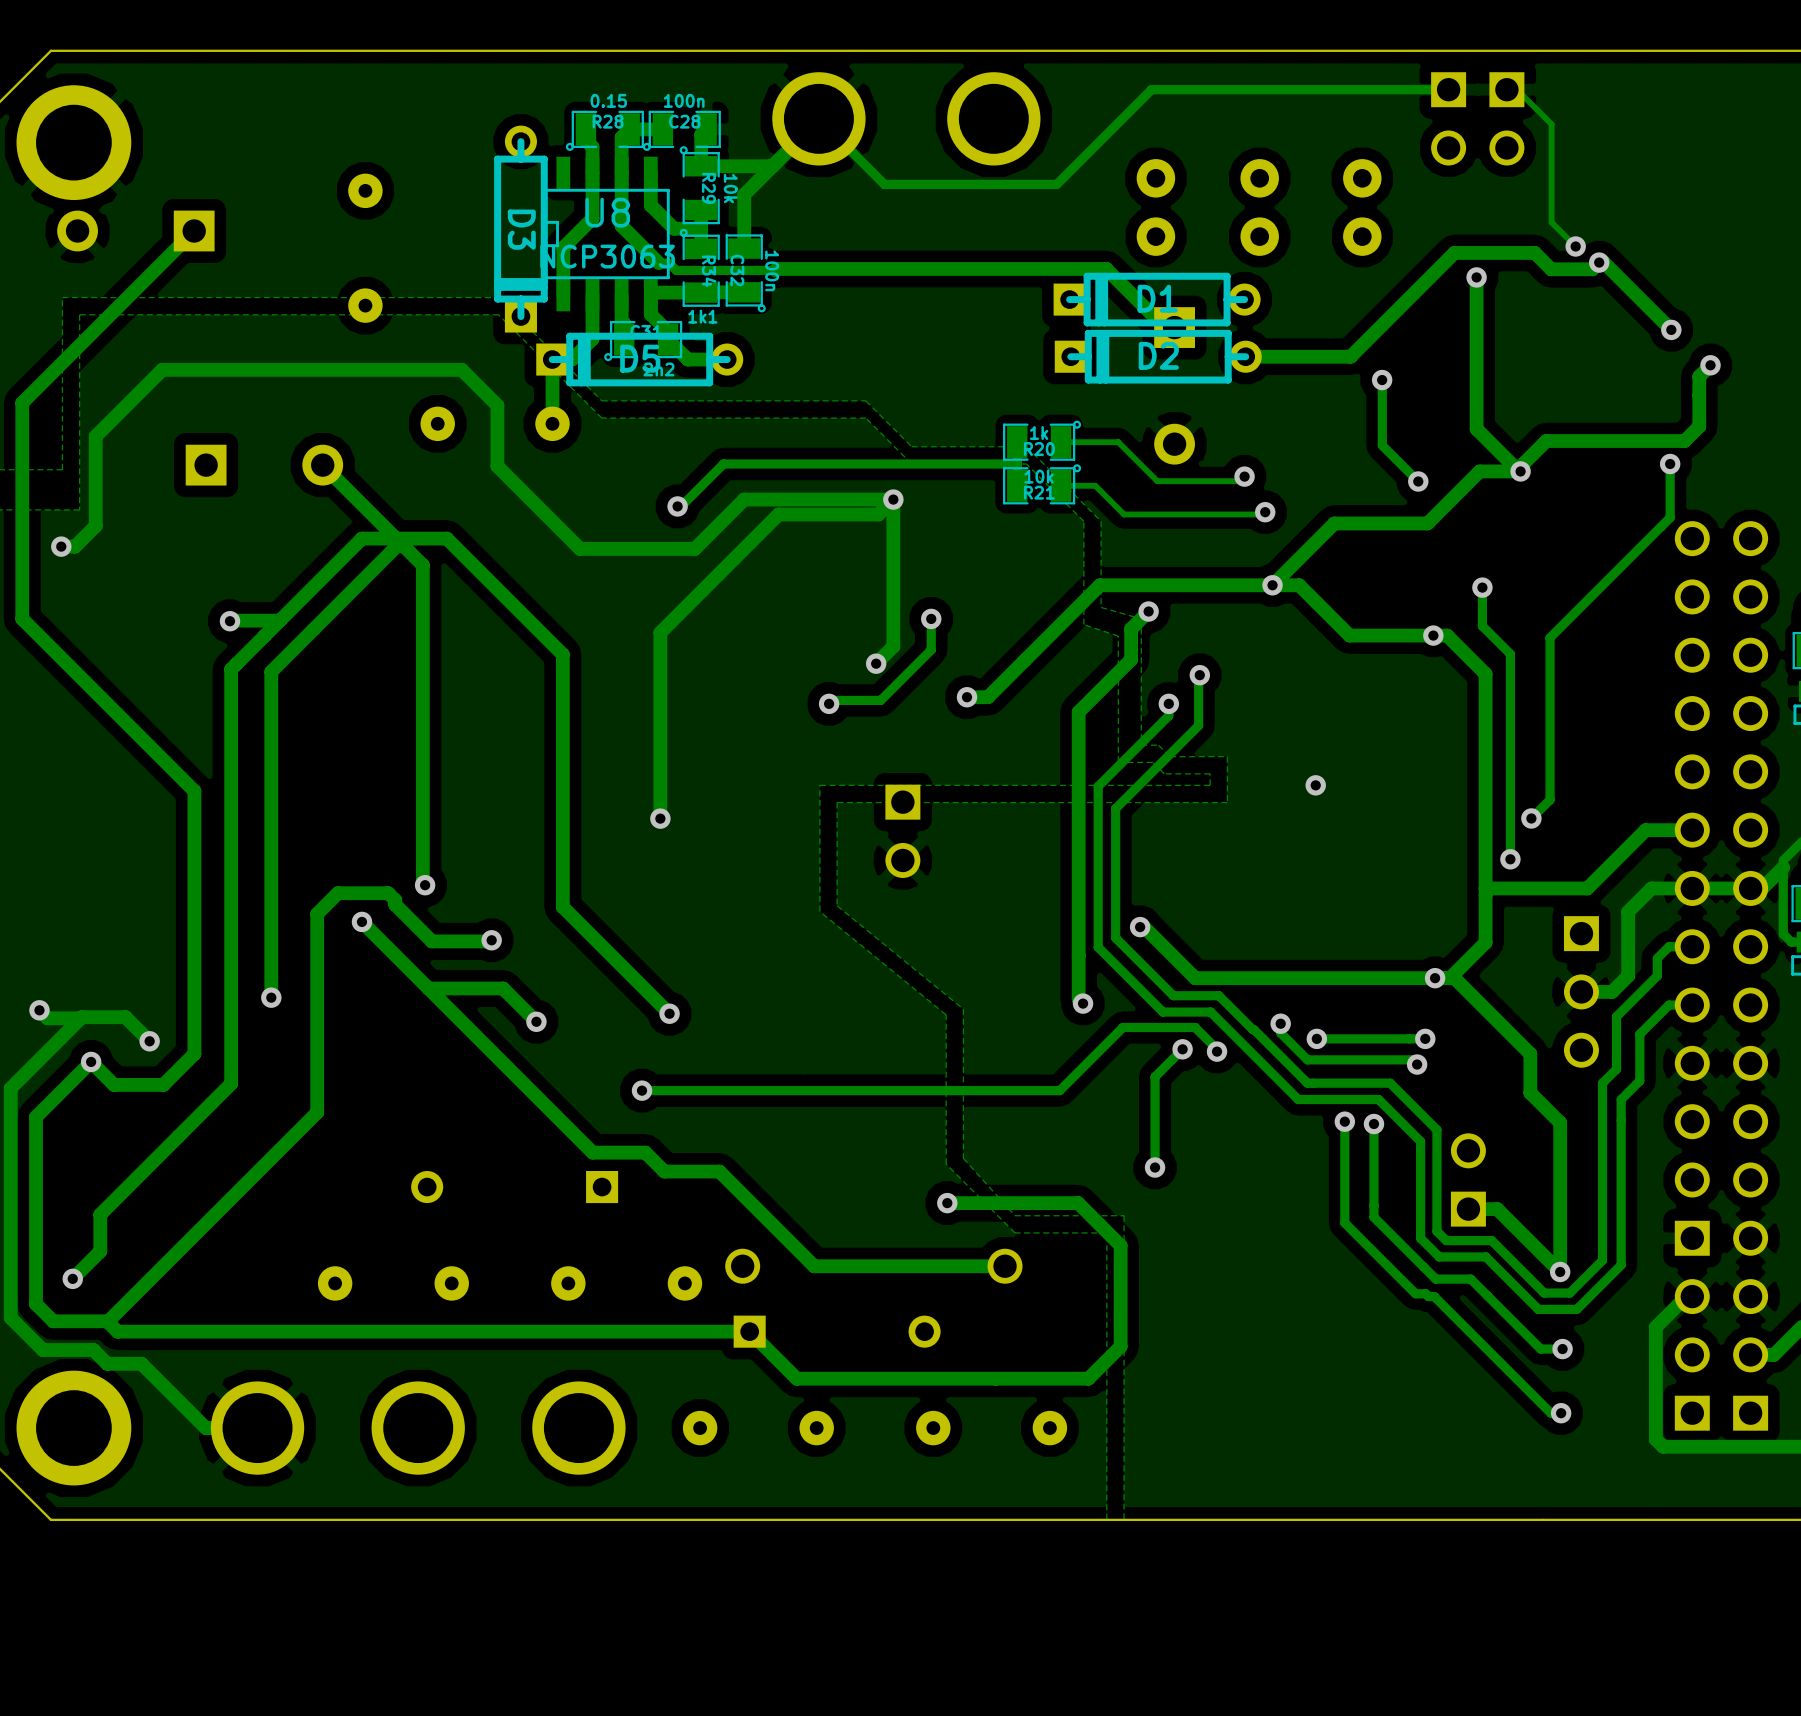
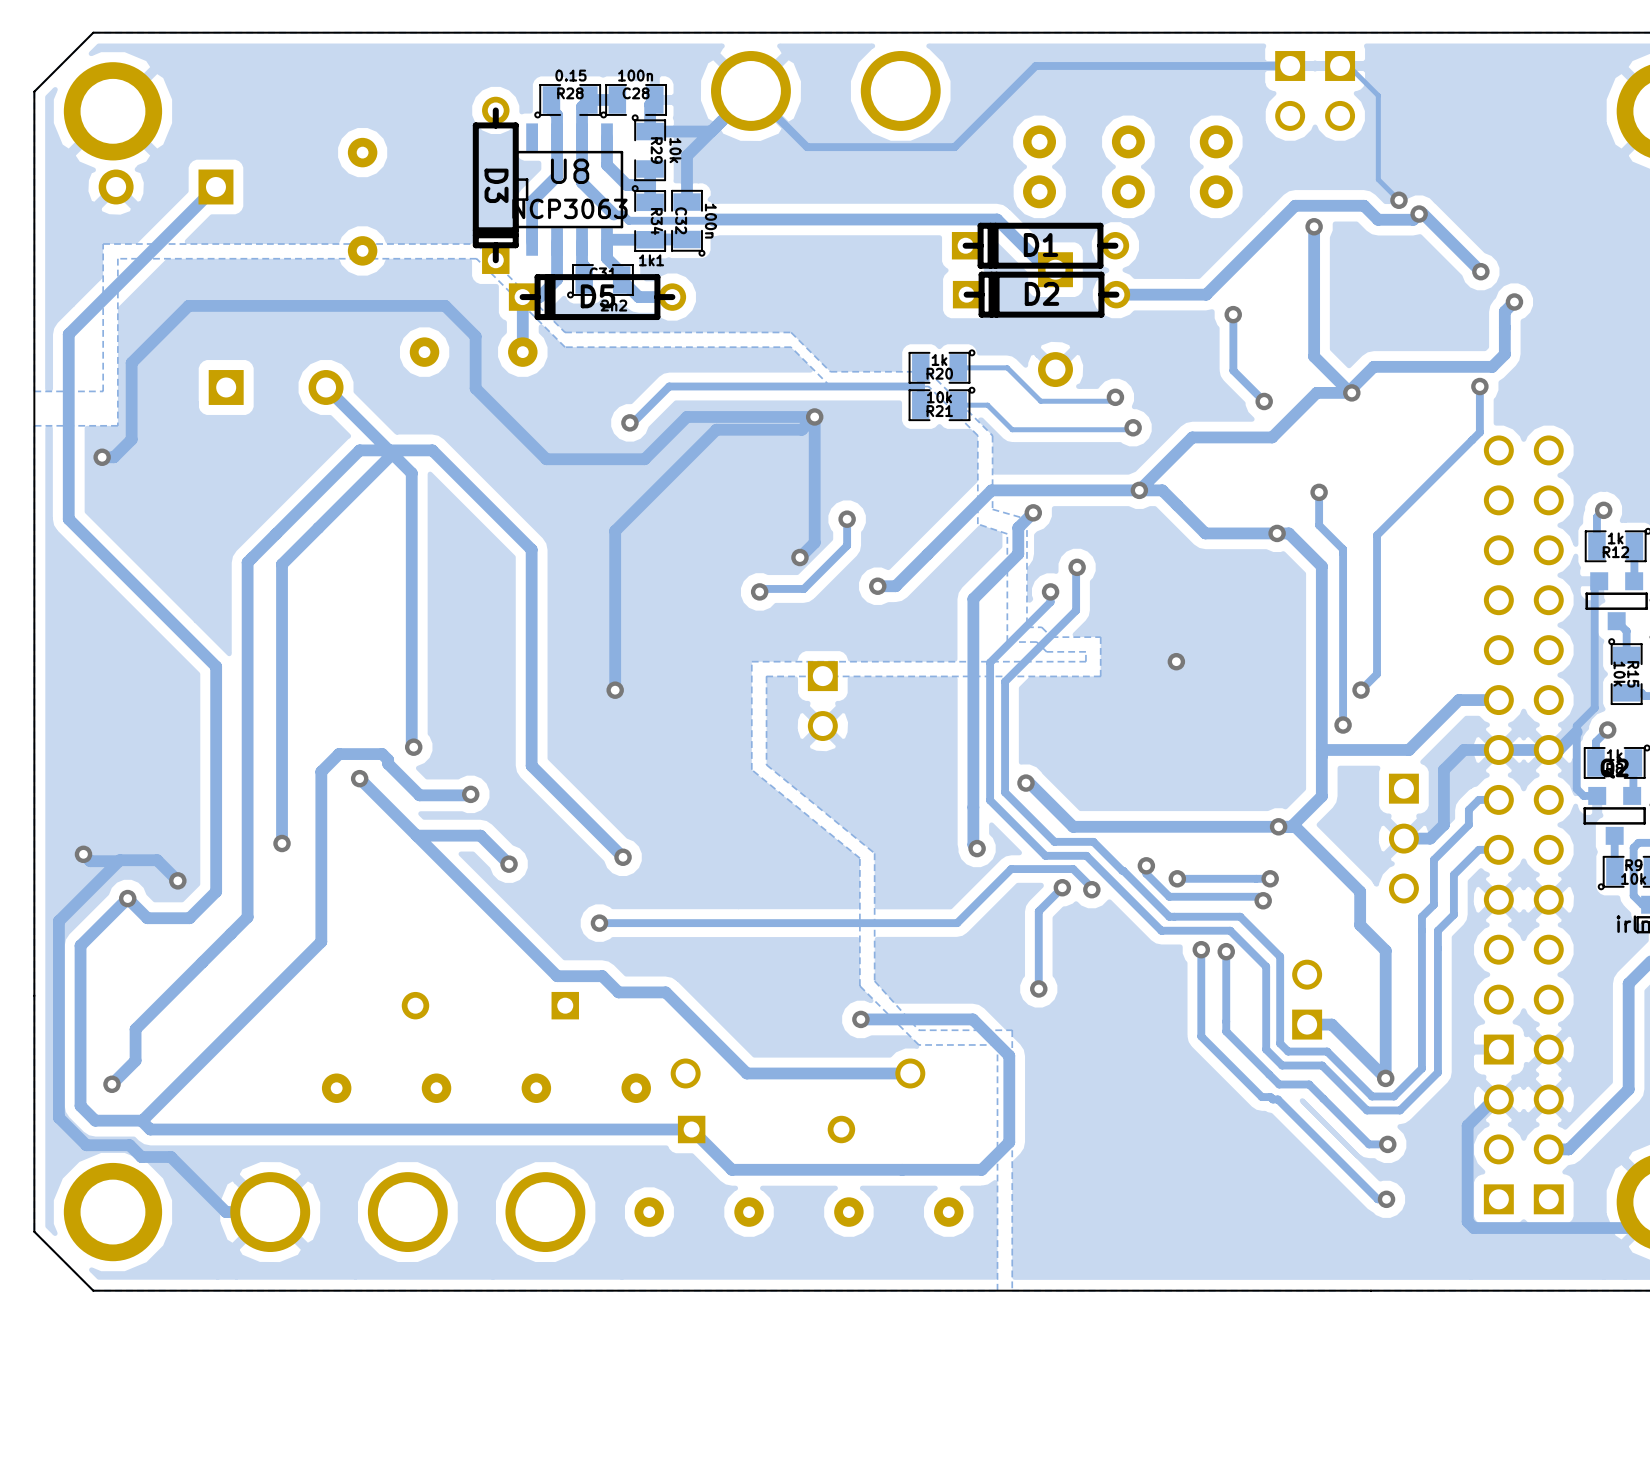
track: (279, 620) (229, 621) -> none
via: (229, 621) -> none

